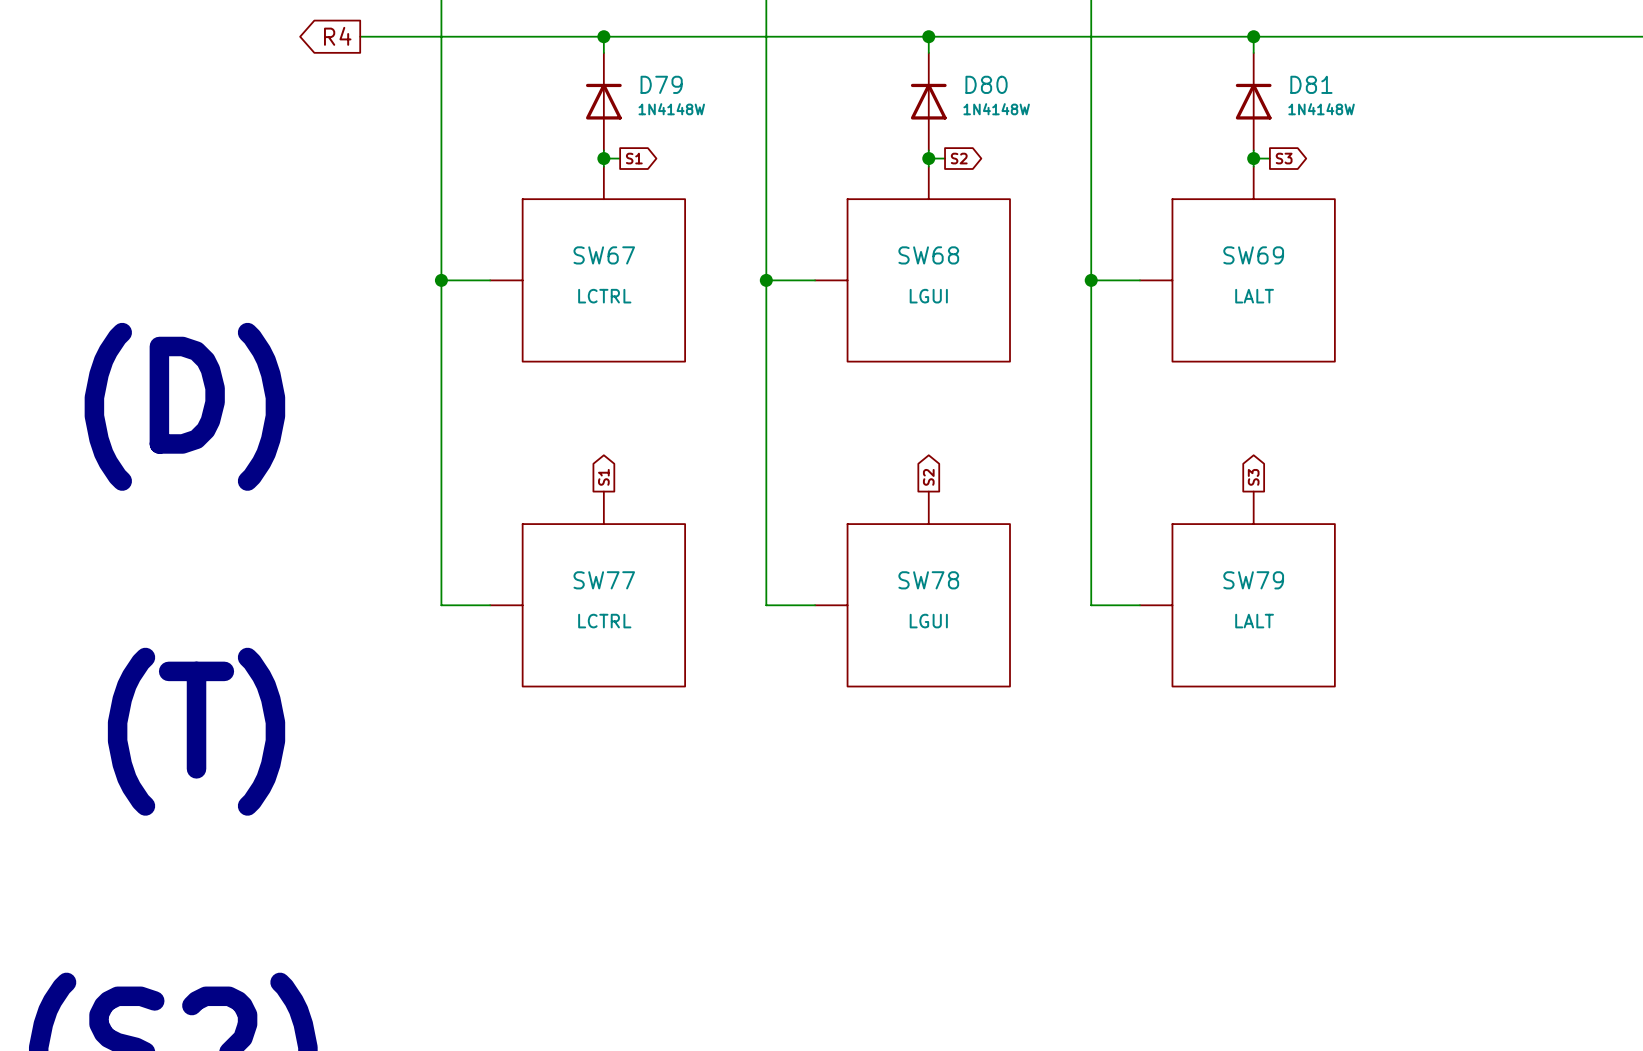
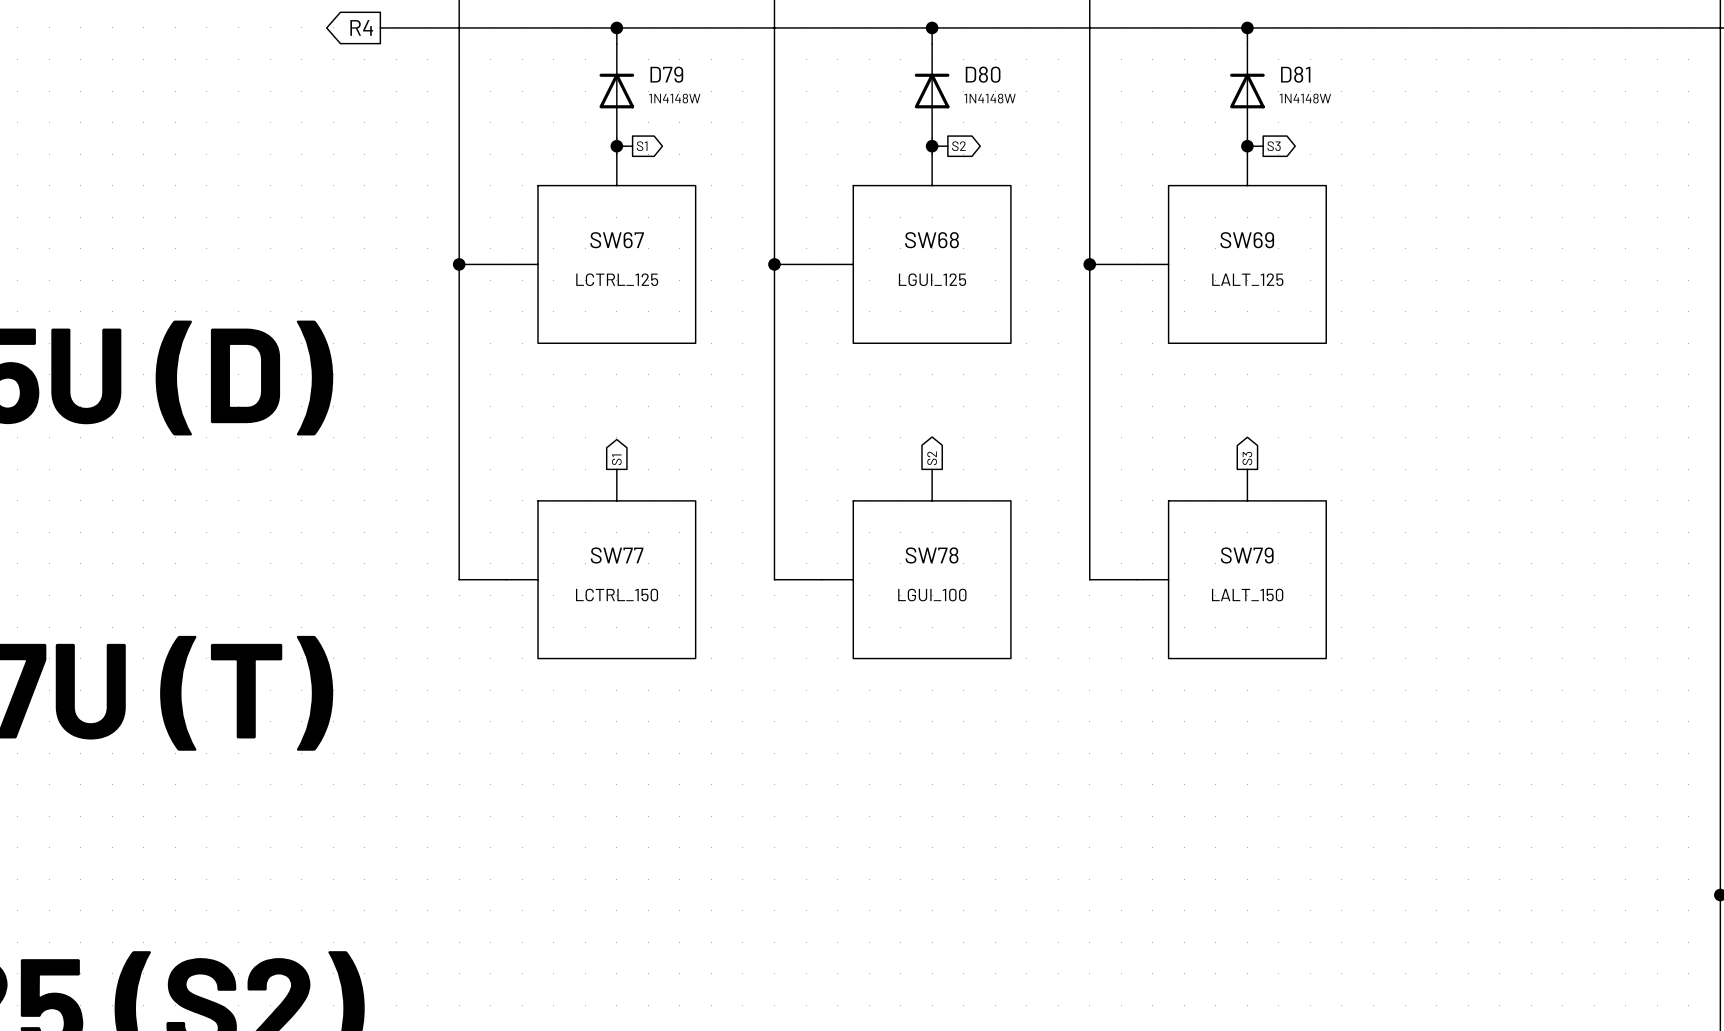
SW67 value: LCTRL (604, 296) -> LCTRL_125 (617, 279)
SW68 value: LGUI (928, 296) -> LGUI_125 (932, 279)
SW69 value: LALT (1254, 296) -> LALT_125 (1247, 279)
SW77 value: LCTRL (604, 621) -> LCTRL_150 (617, 595)
SW78 value: LGUI (928, 621) -> LGUI_100 (932, 595)
SW79 value: LALT (1254, 621) -> LALT_150 (1247, 595)

